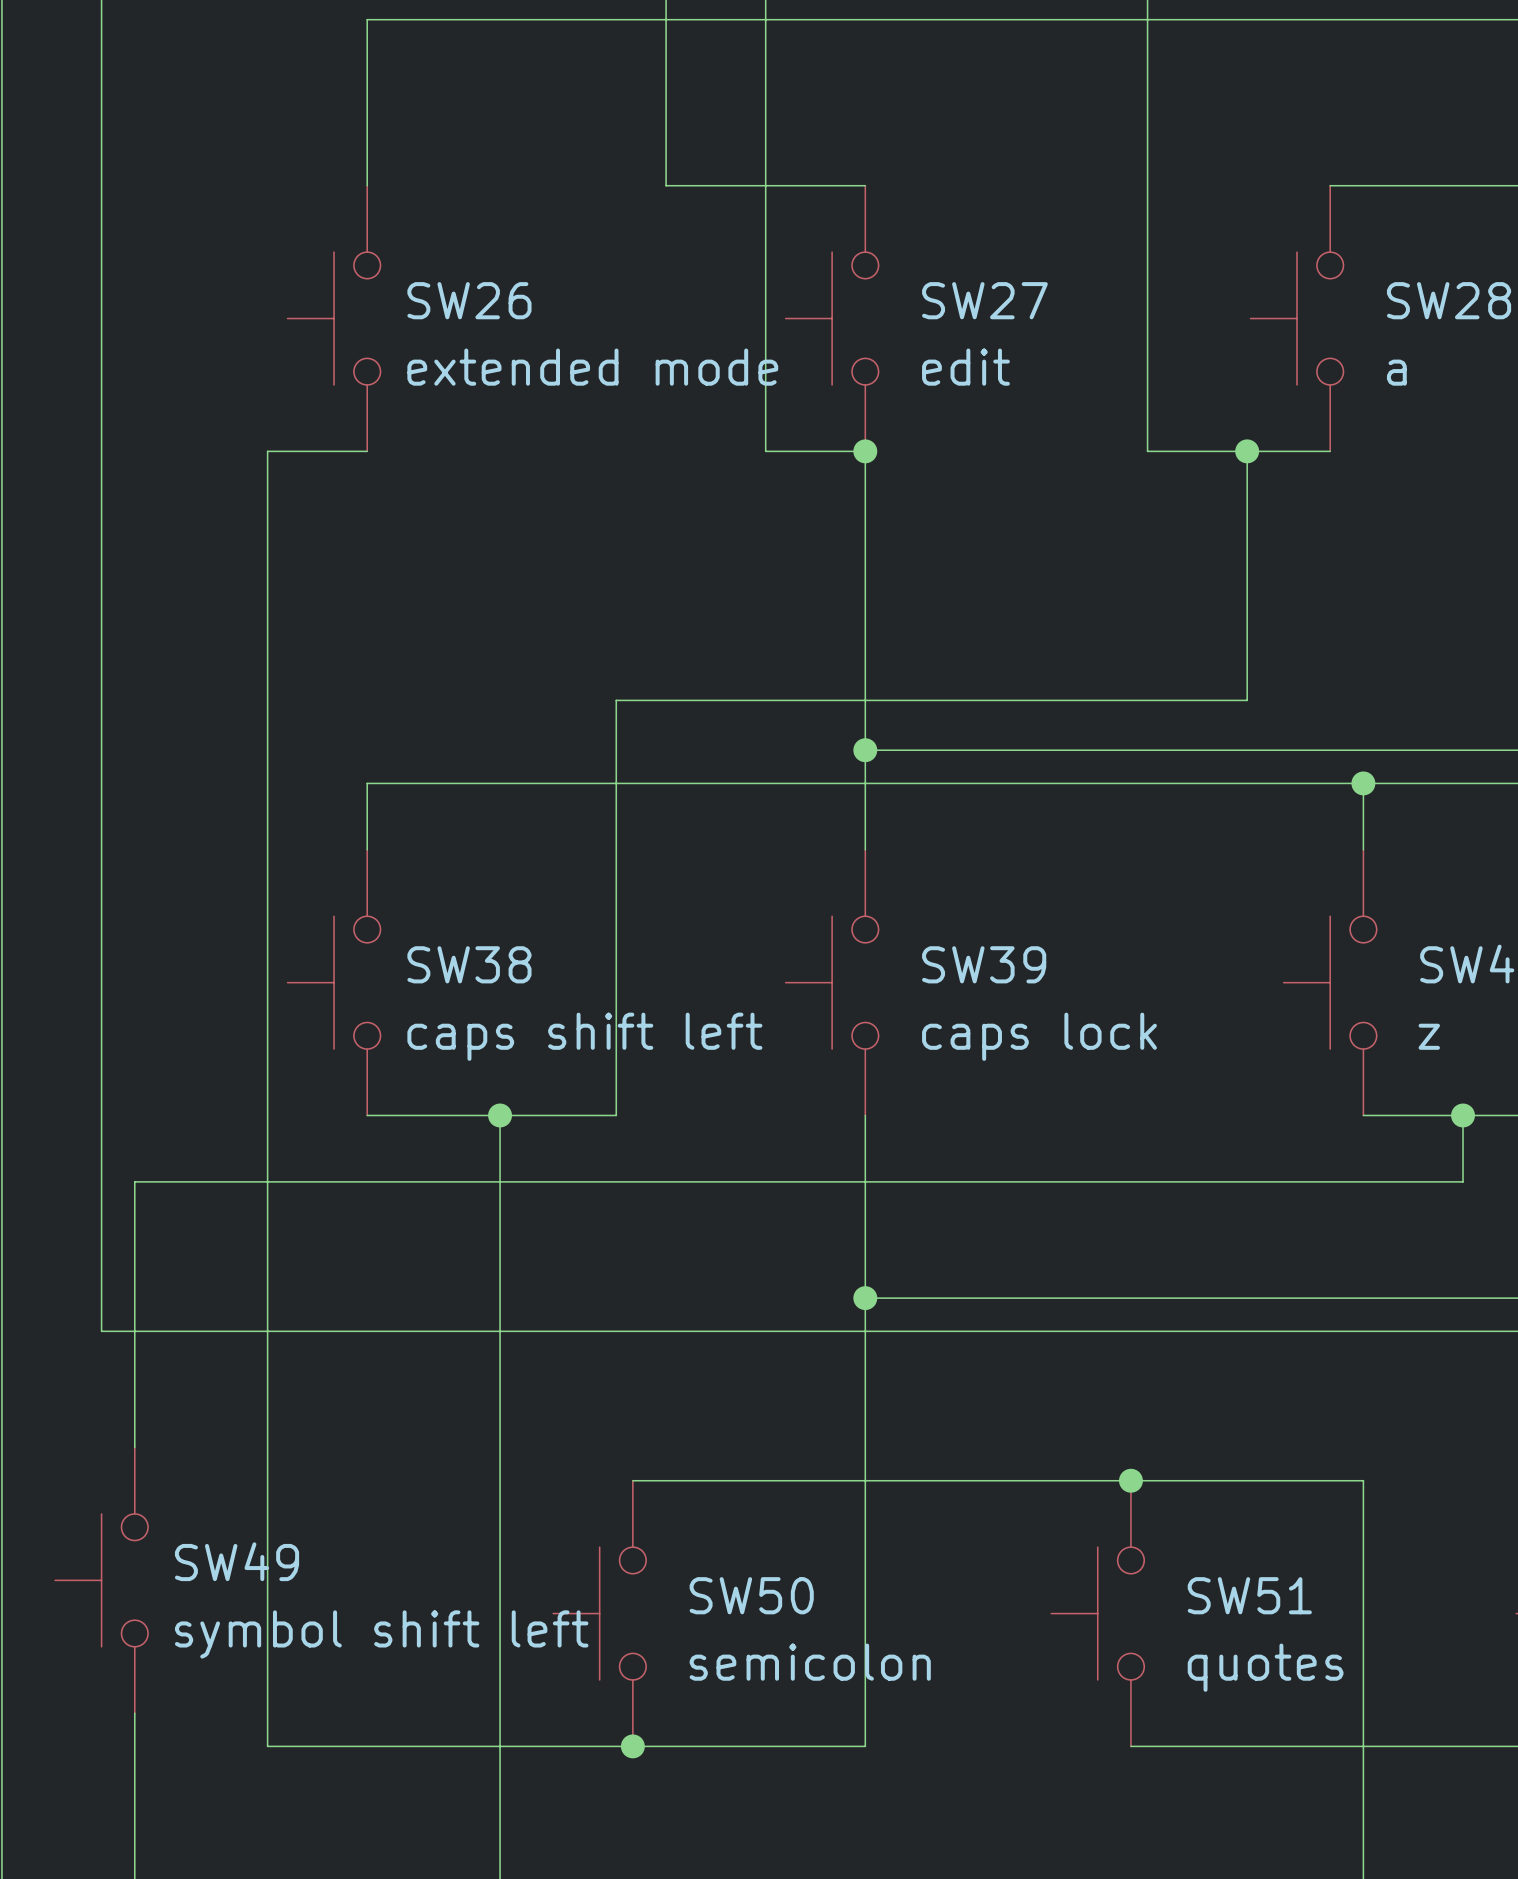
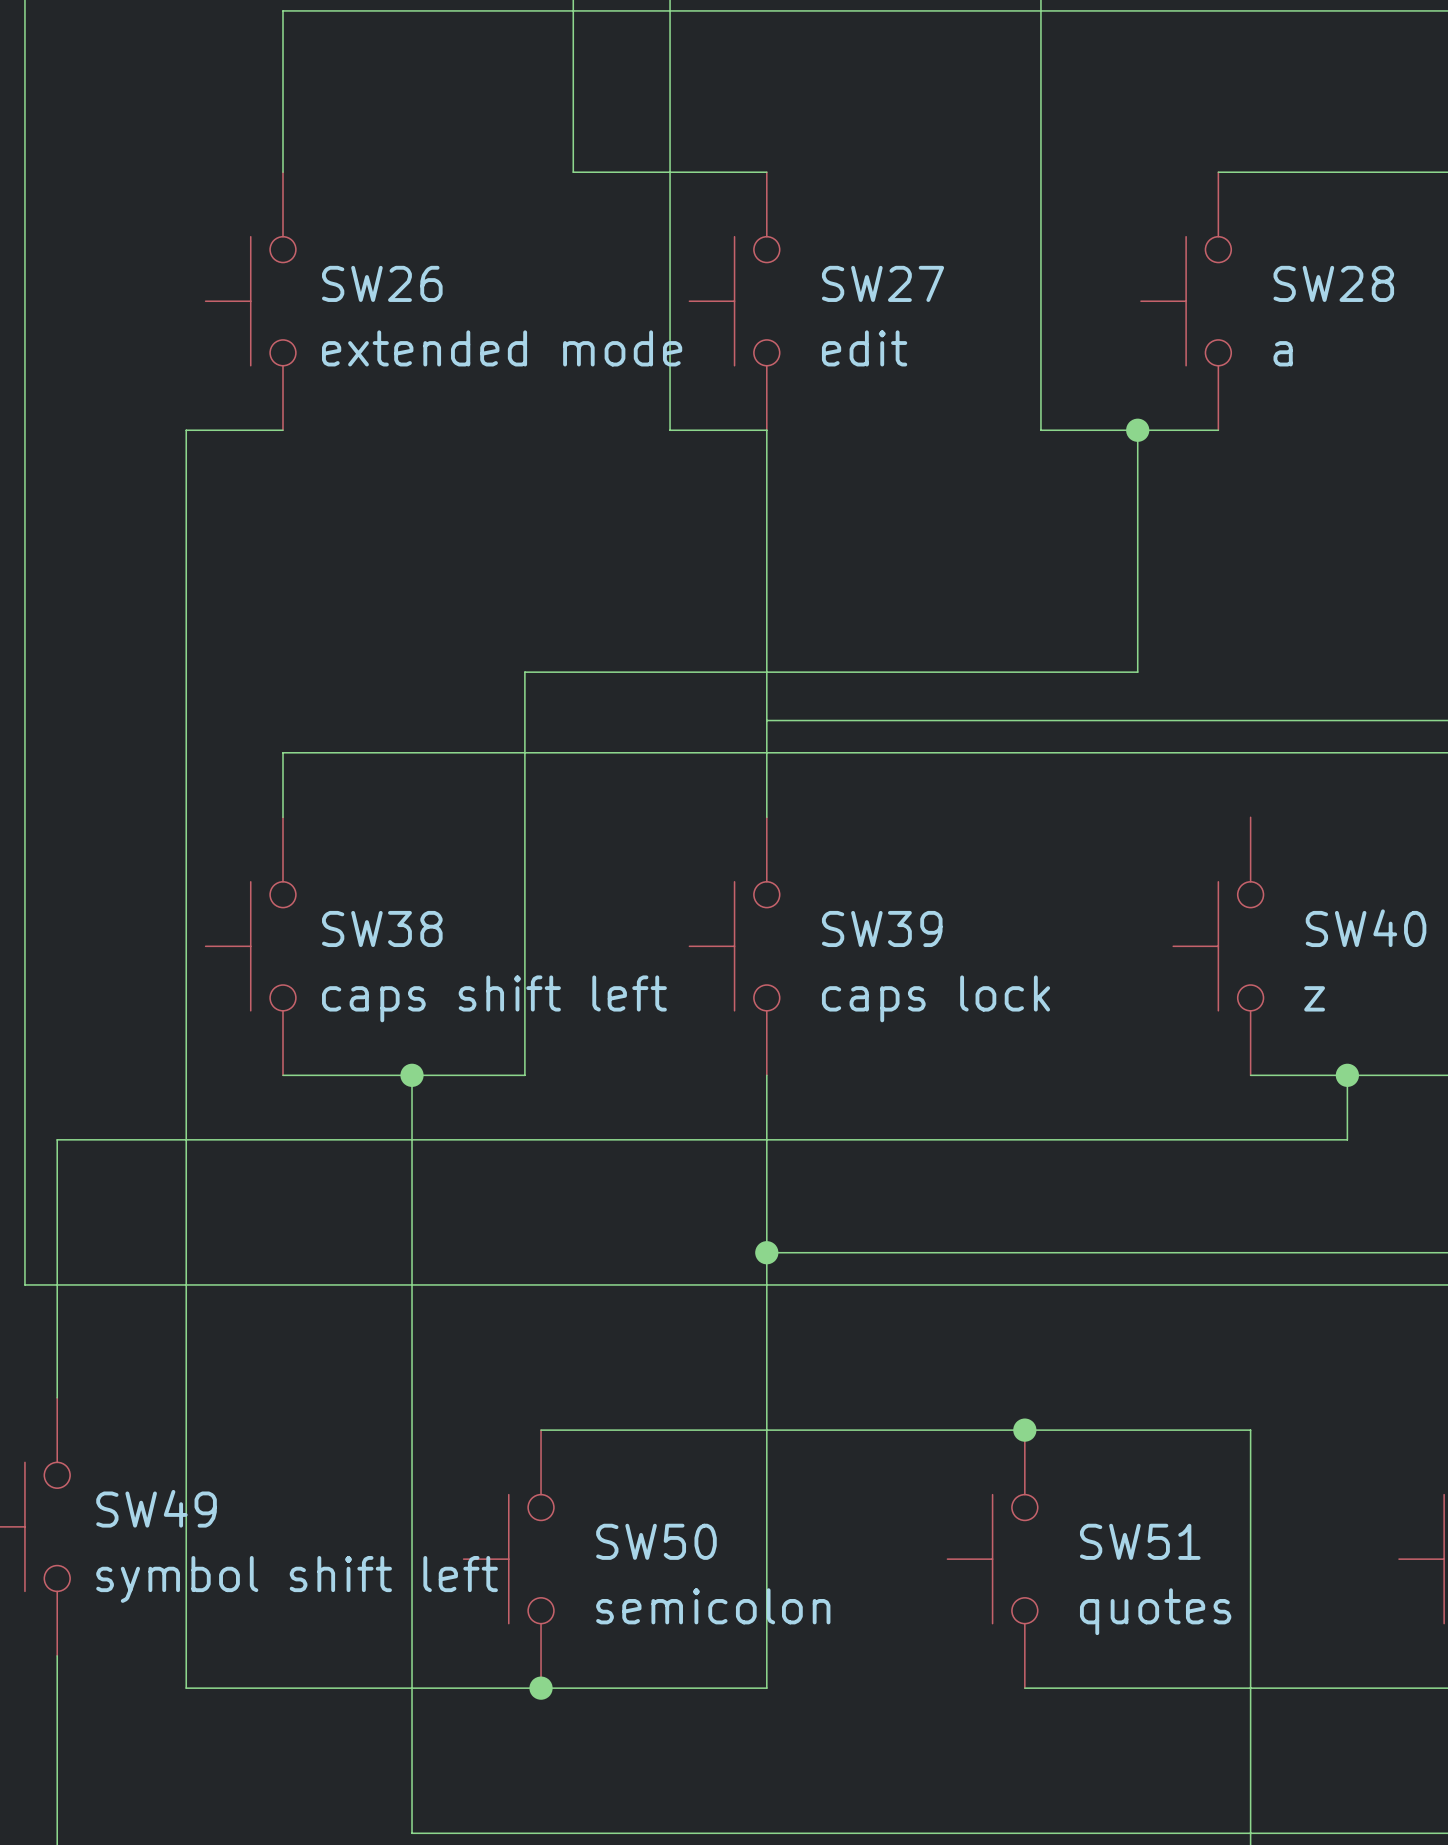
junction: (865, 451) -> none
junction: (865, 750) -> none
wire: (1363, 783) (1363, 849) -> none
junction: (1363, 783) -> none

